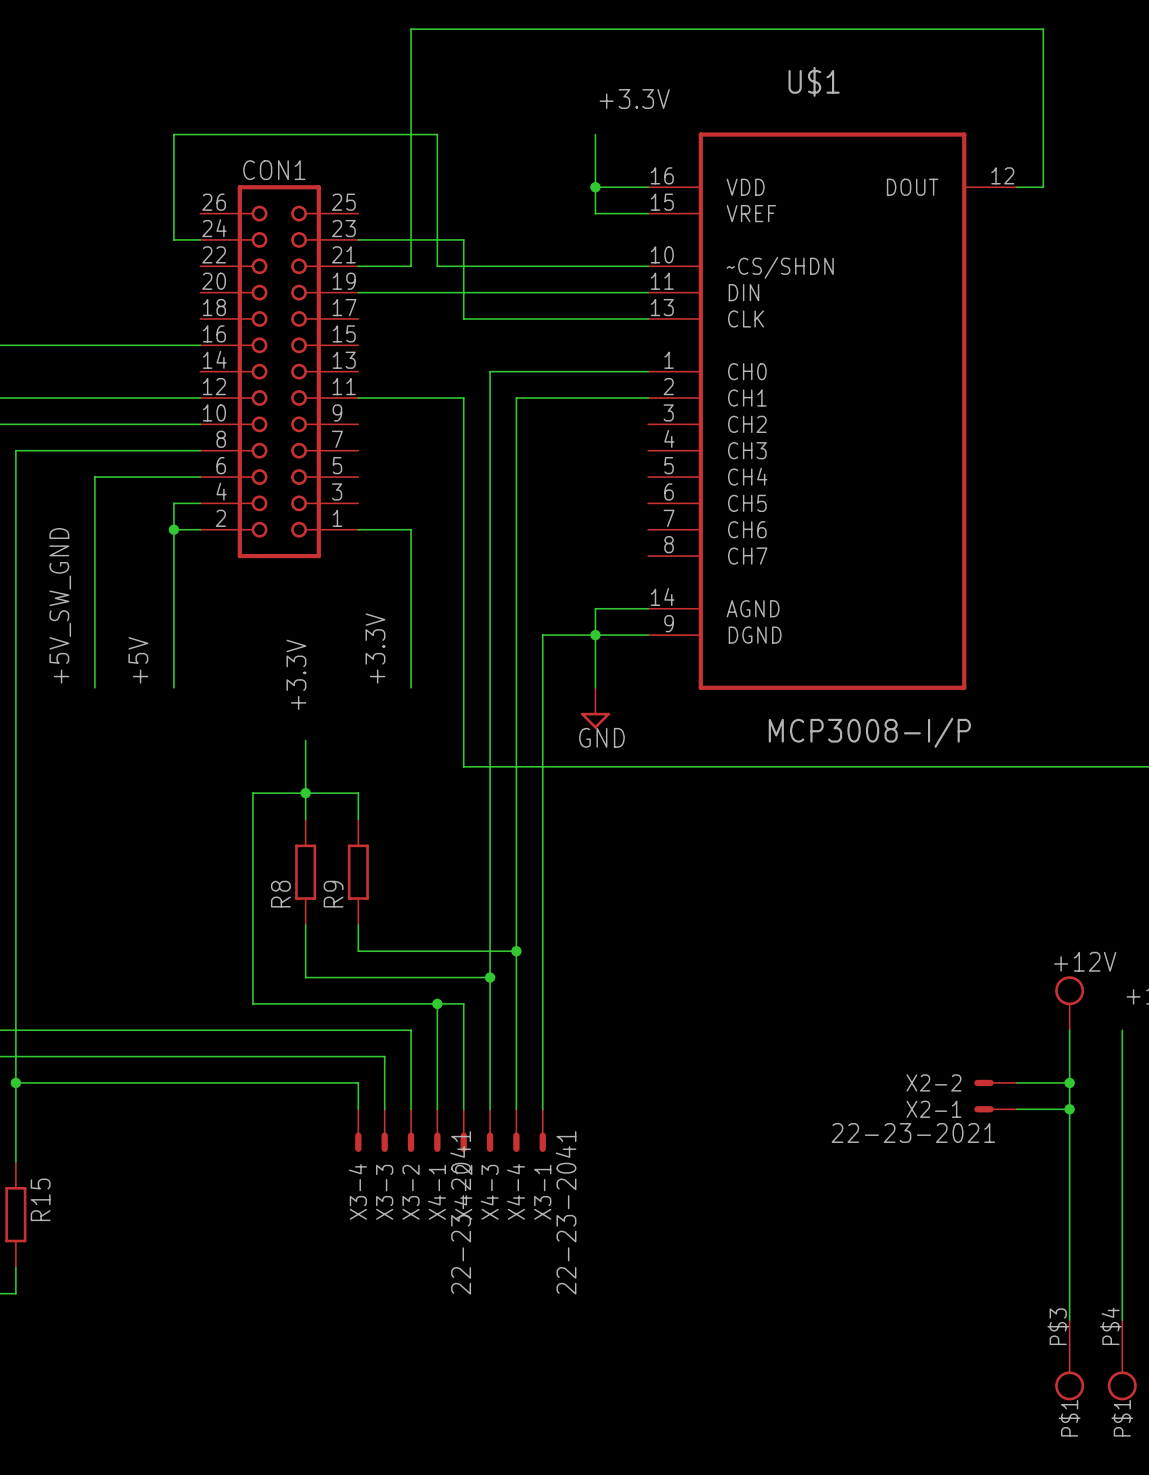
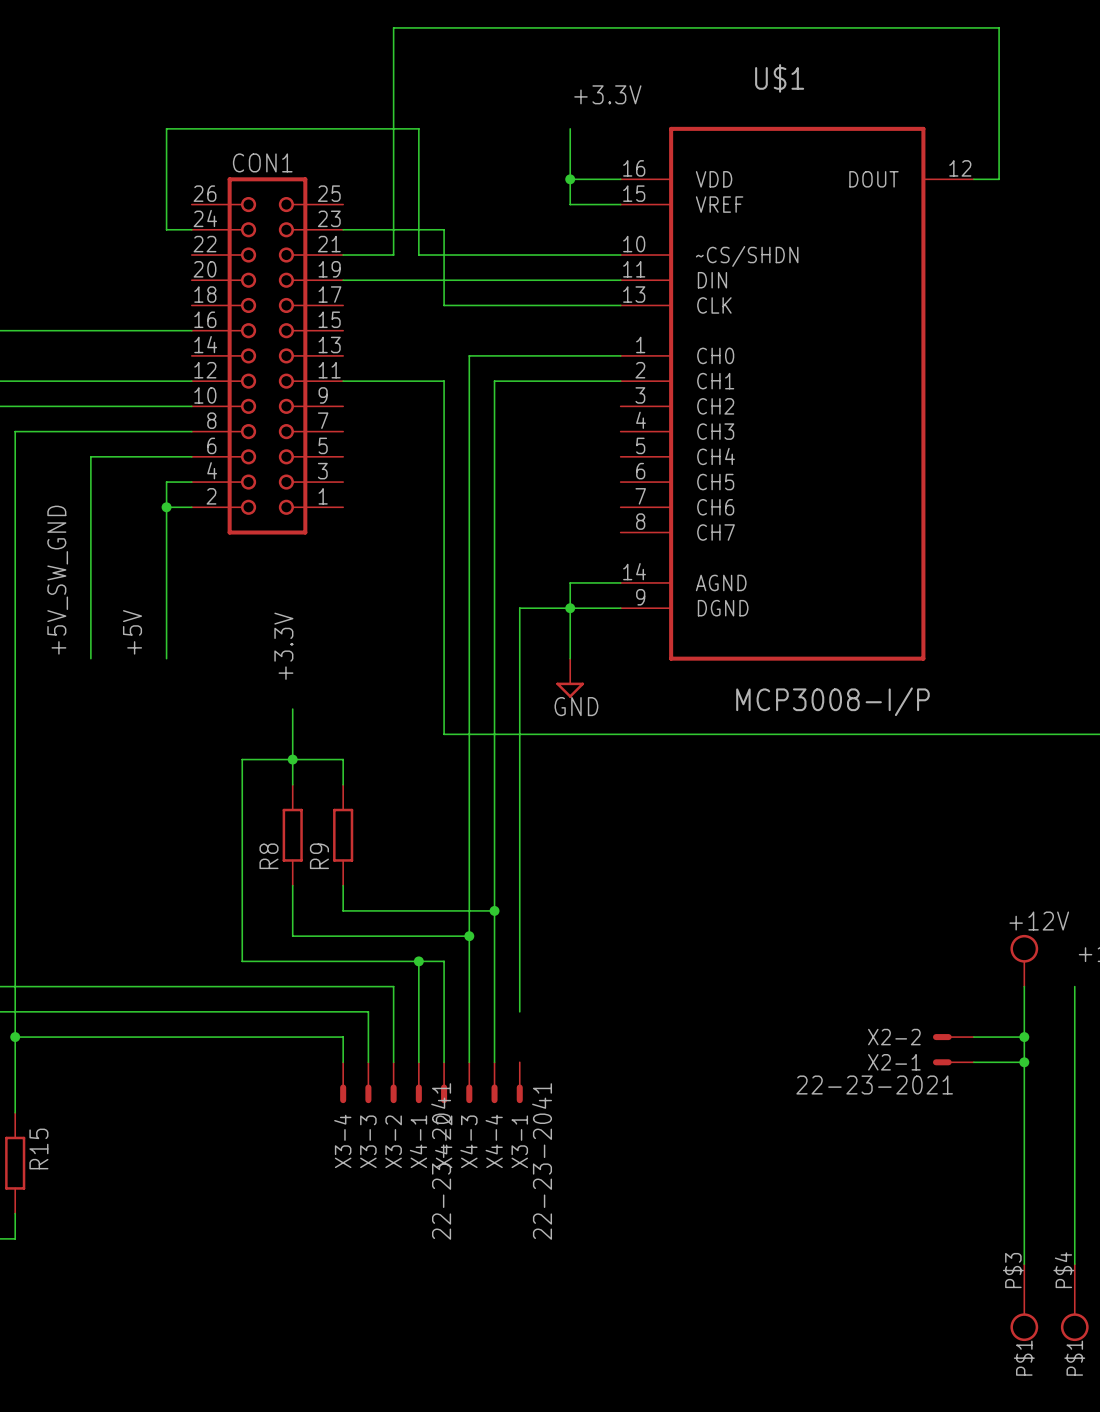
wire: (358, 529) (411, 529) (411, 687) -> none
label: +3.3V (375, 648) -> none
wire: (542, 1056) (542, 1109) -> none

